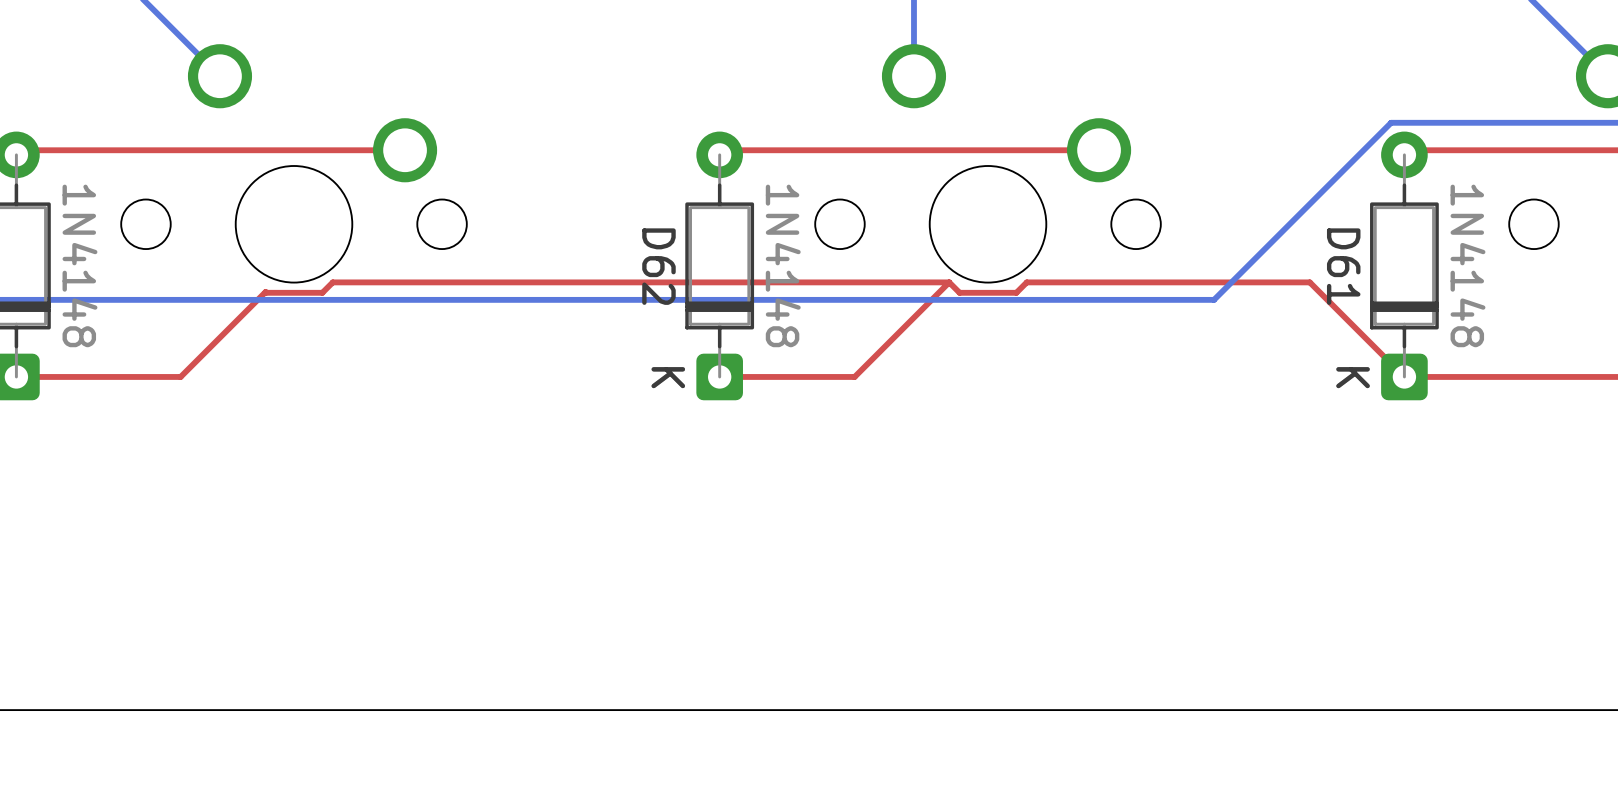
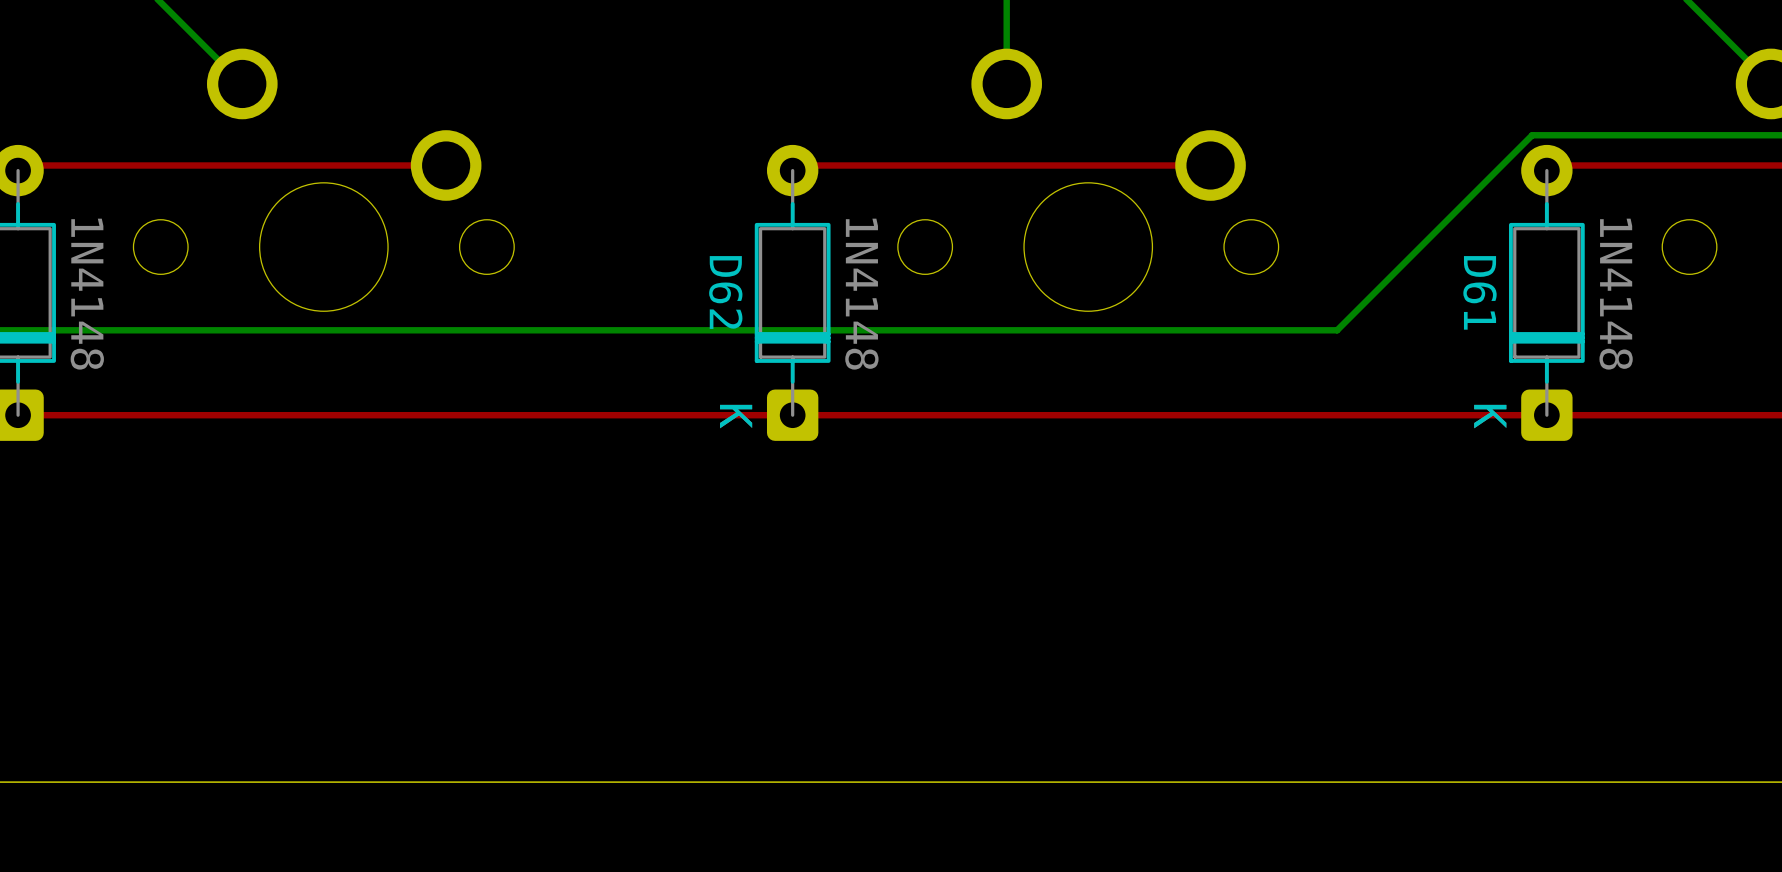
top track: (949, 282) (959, 292) (1016, 292) (1026, 282) (1309, 282) (1404, 376) -> (941, 415) (1546, 415)
top track: (949, 282) (332, 282) (322, 292) (265, 291) (180, 376) -> (792, 415) (198, 415)
top track: (949, 282) (854, 376) -> none

